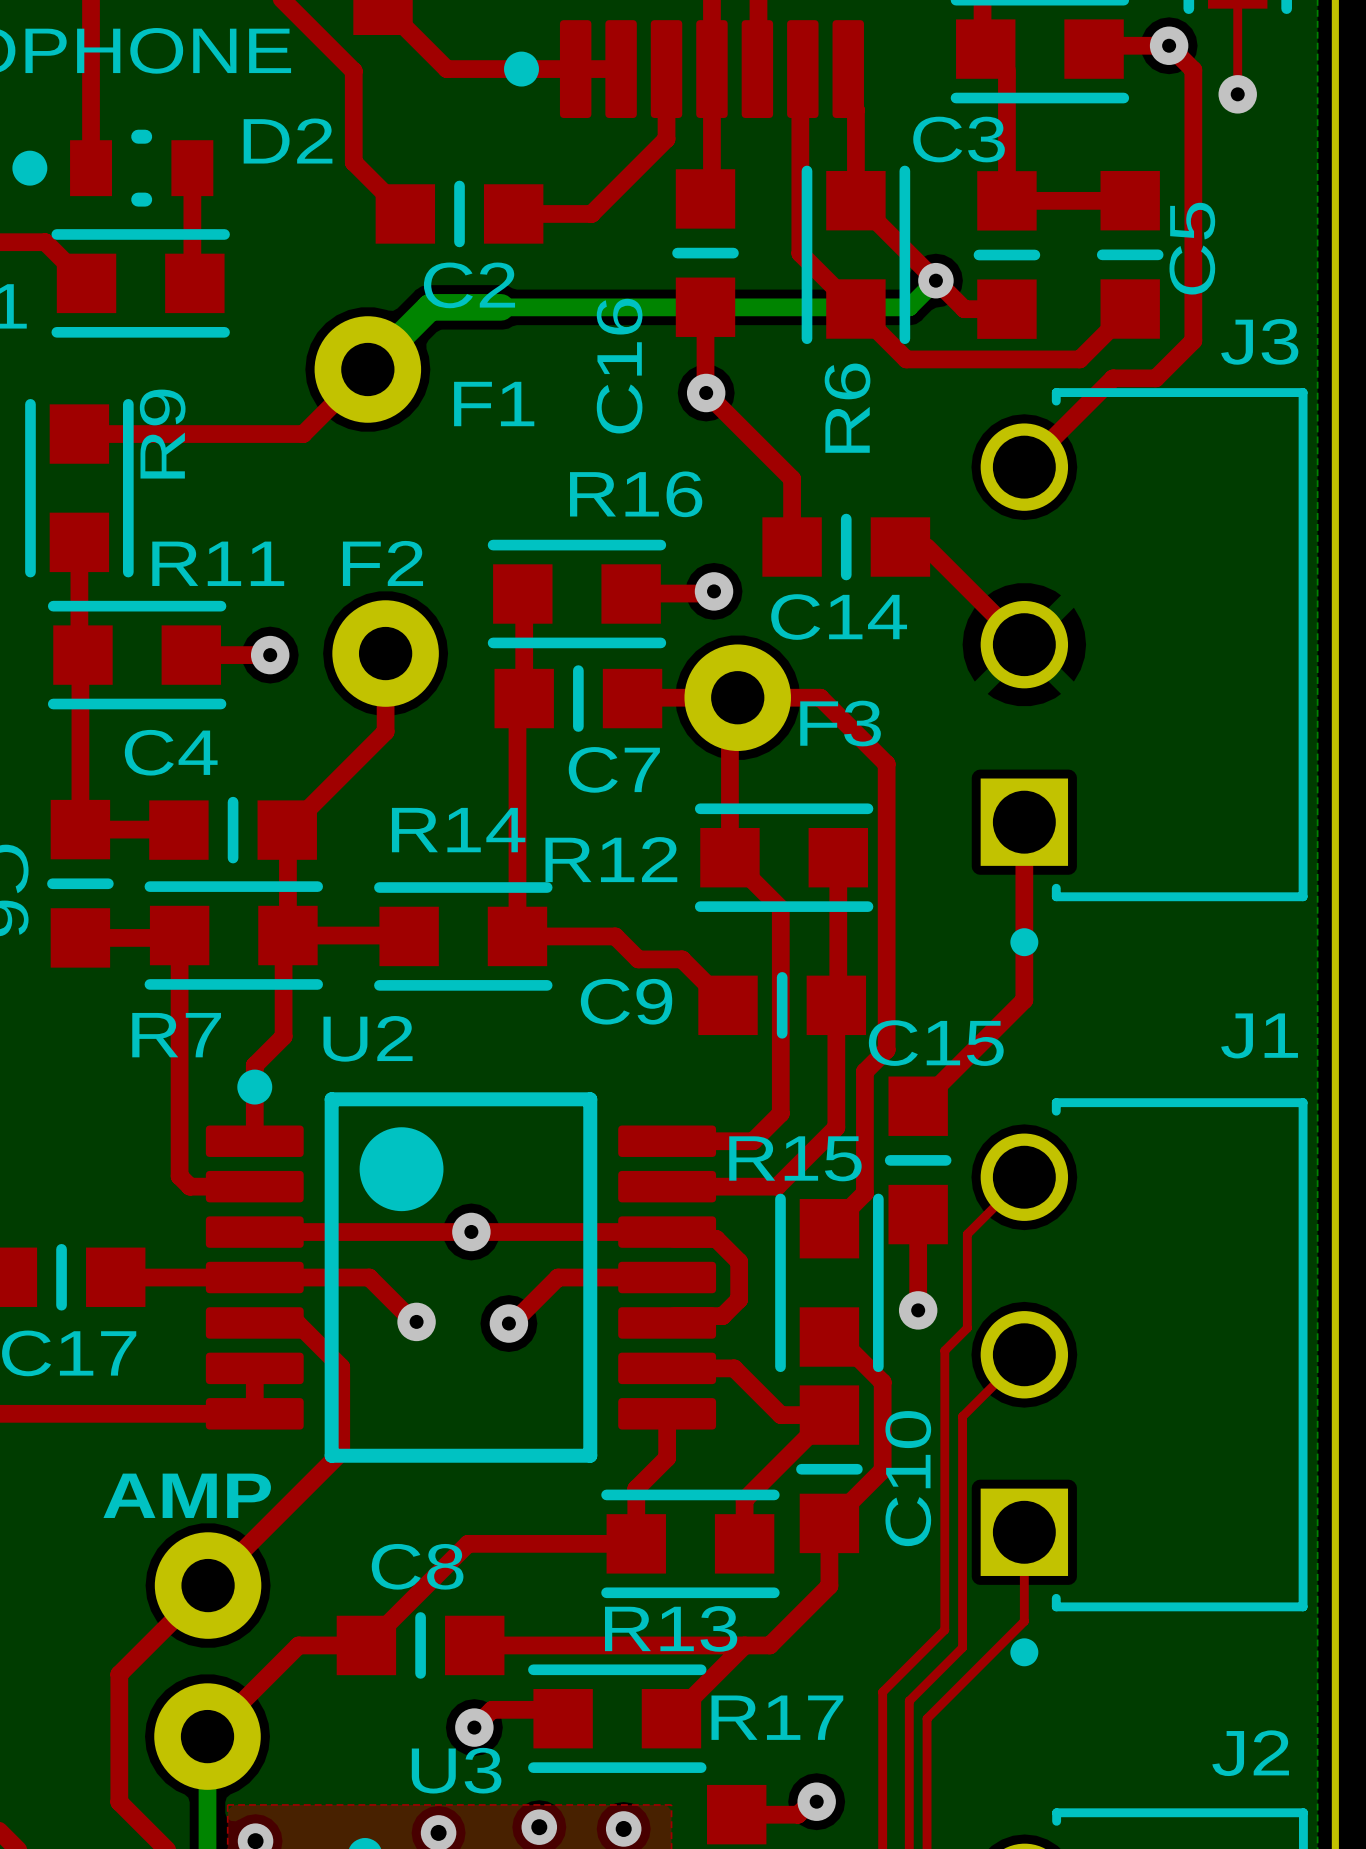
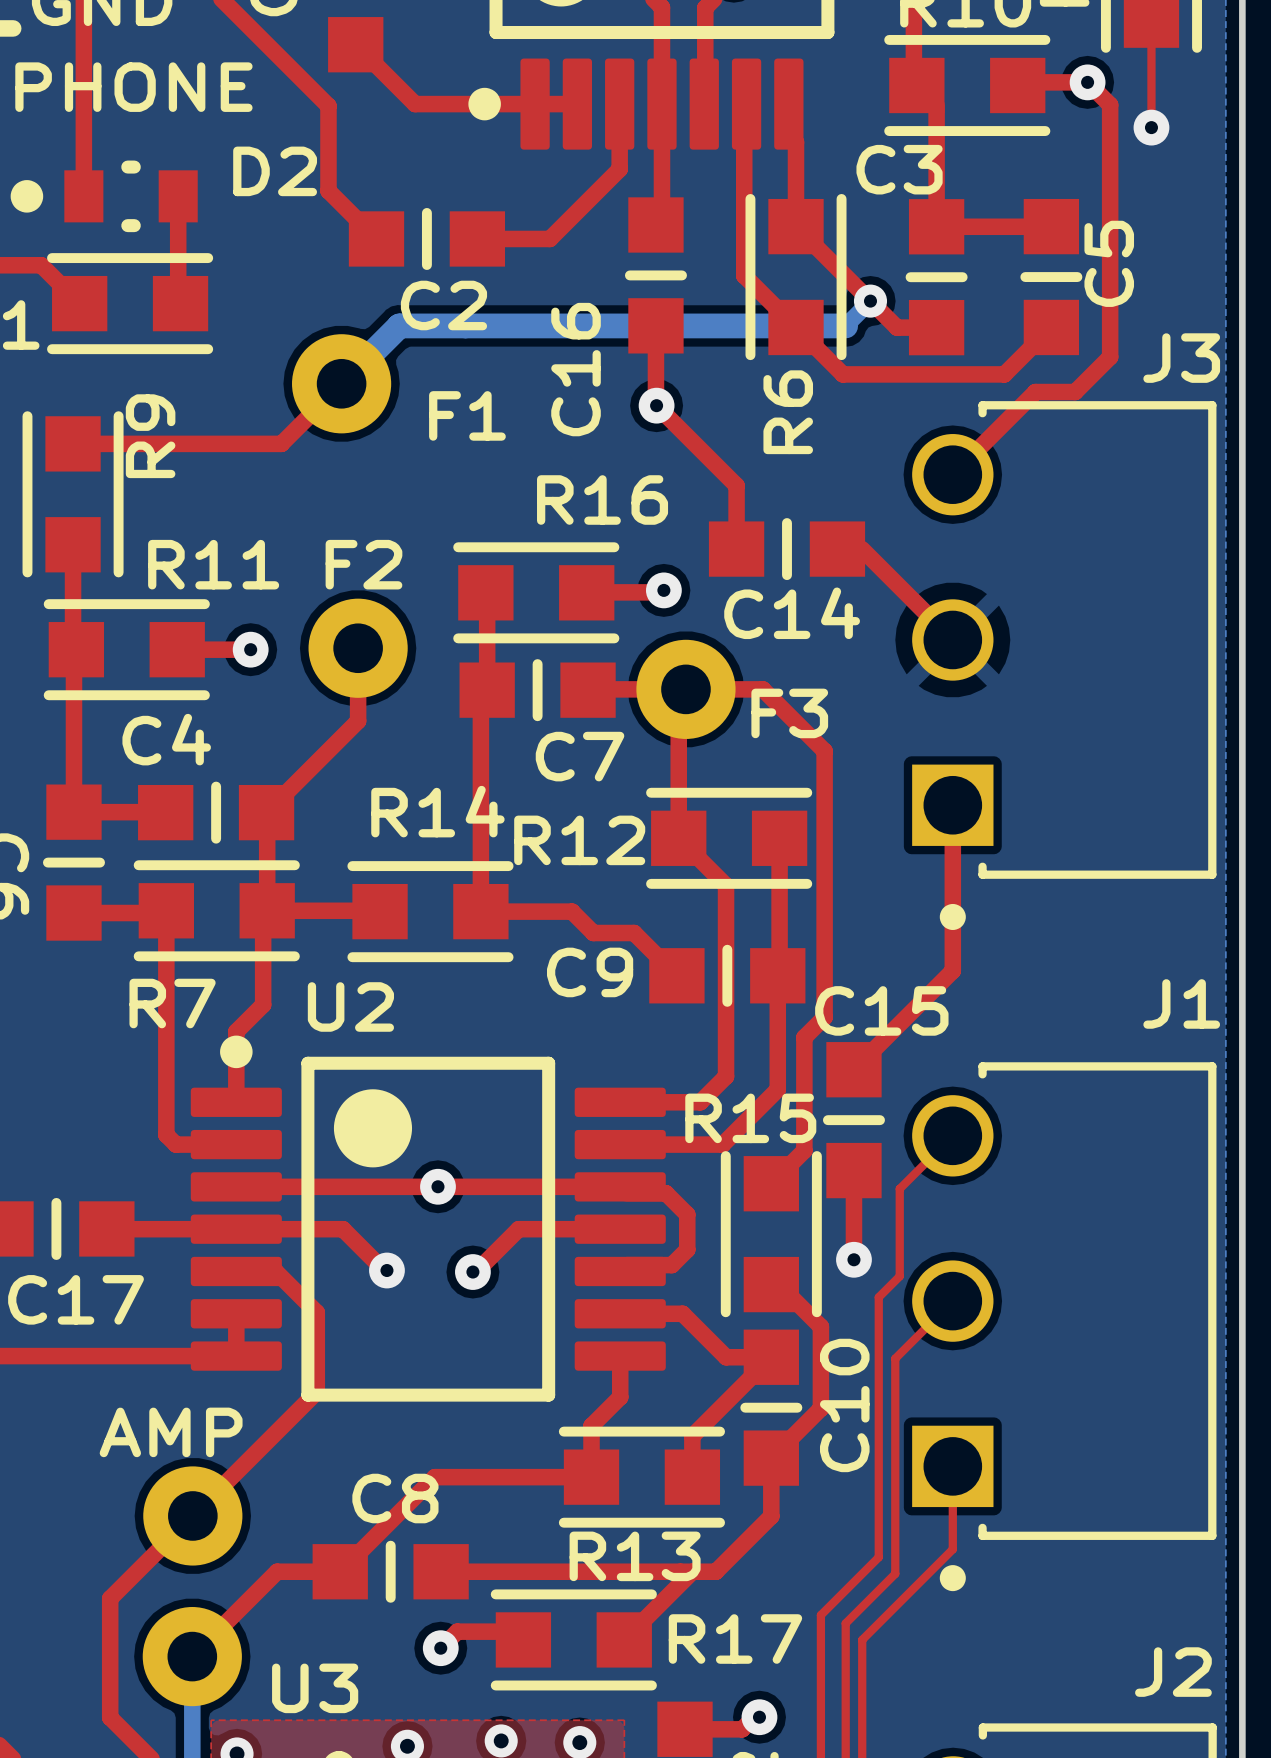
bottom track width: thin (500, 307) (909, 307) -> thick (465, 325) (845, 325)
U3 name position: U3 (456, 1770) -> U3 (315, 1688)

